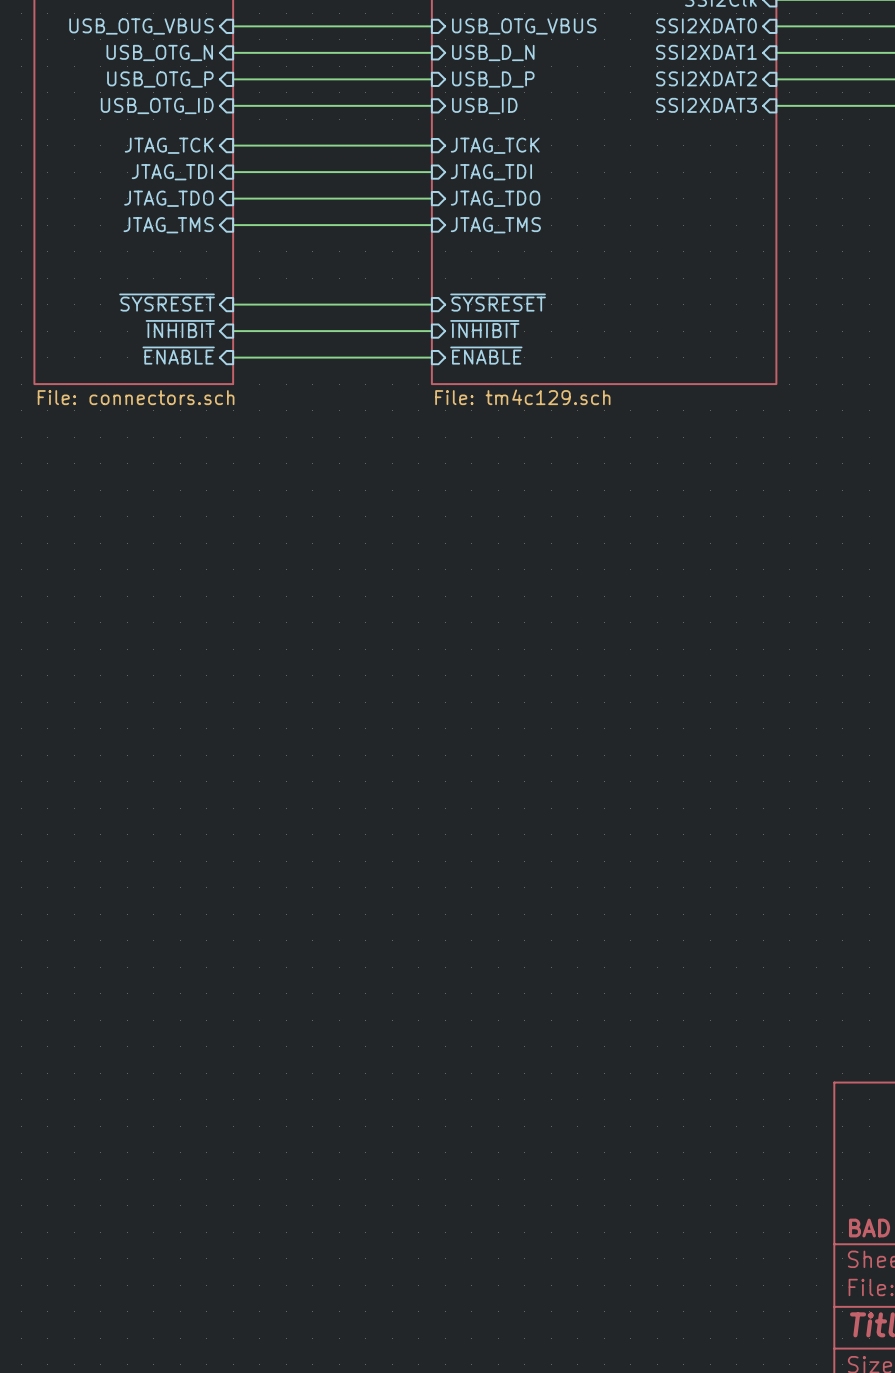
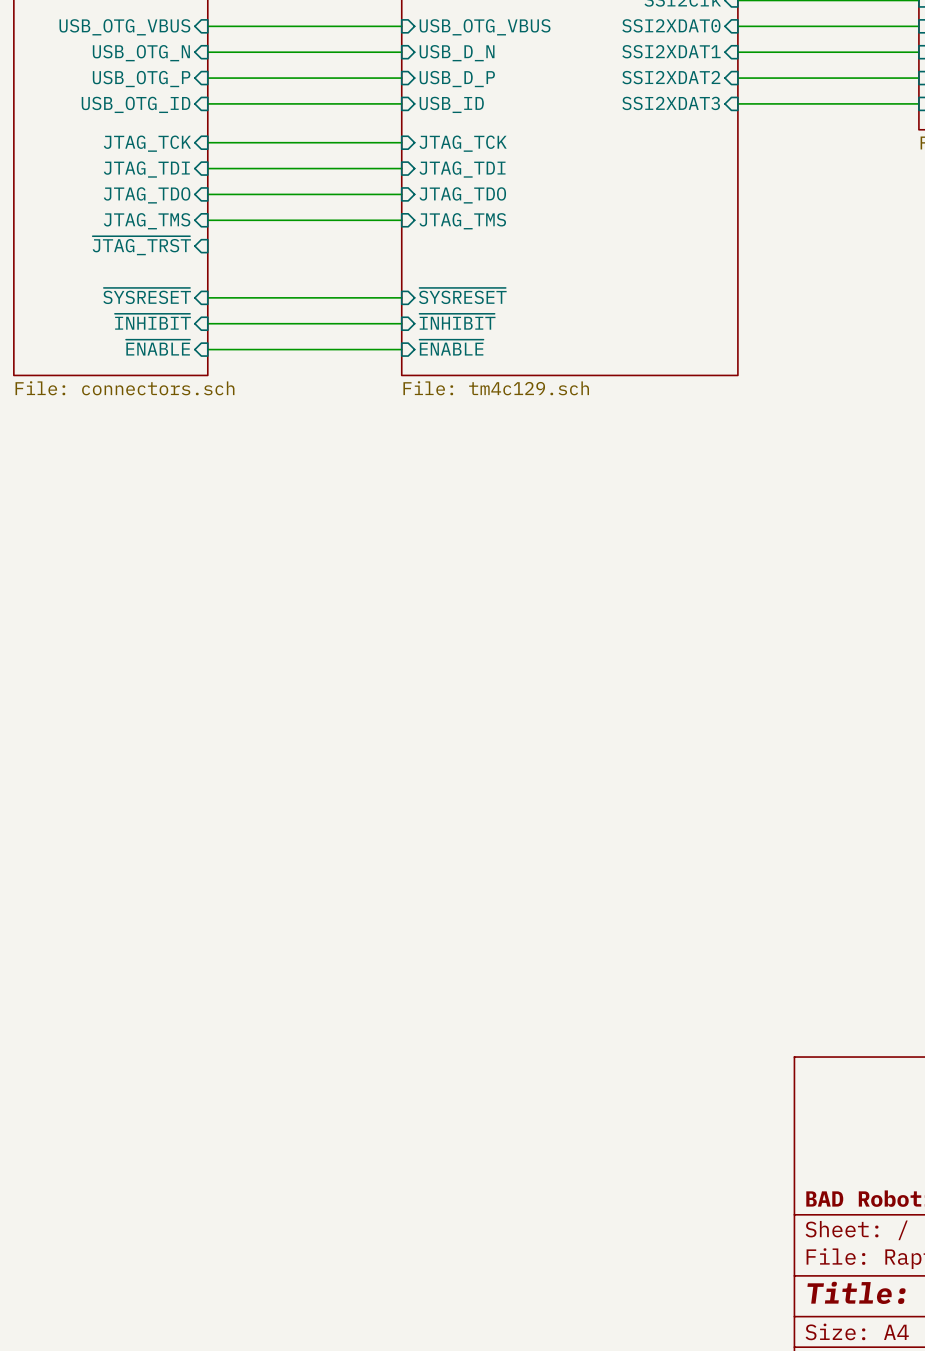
sheet pin: none -> ~{JTAG_TRST} (141, 245)

